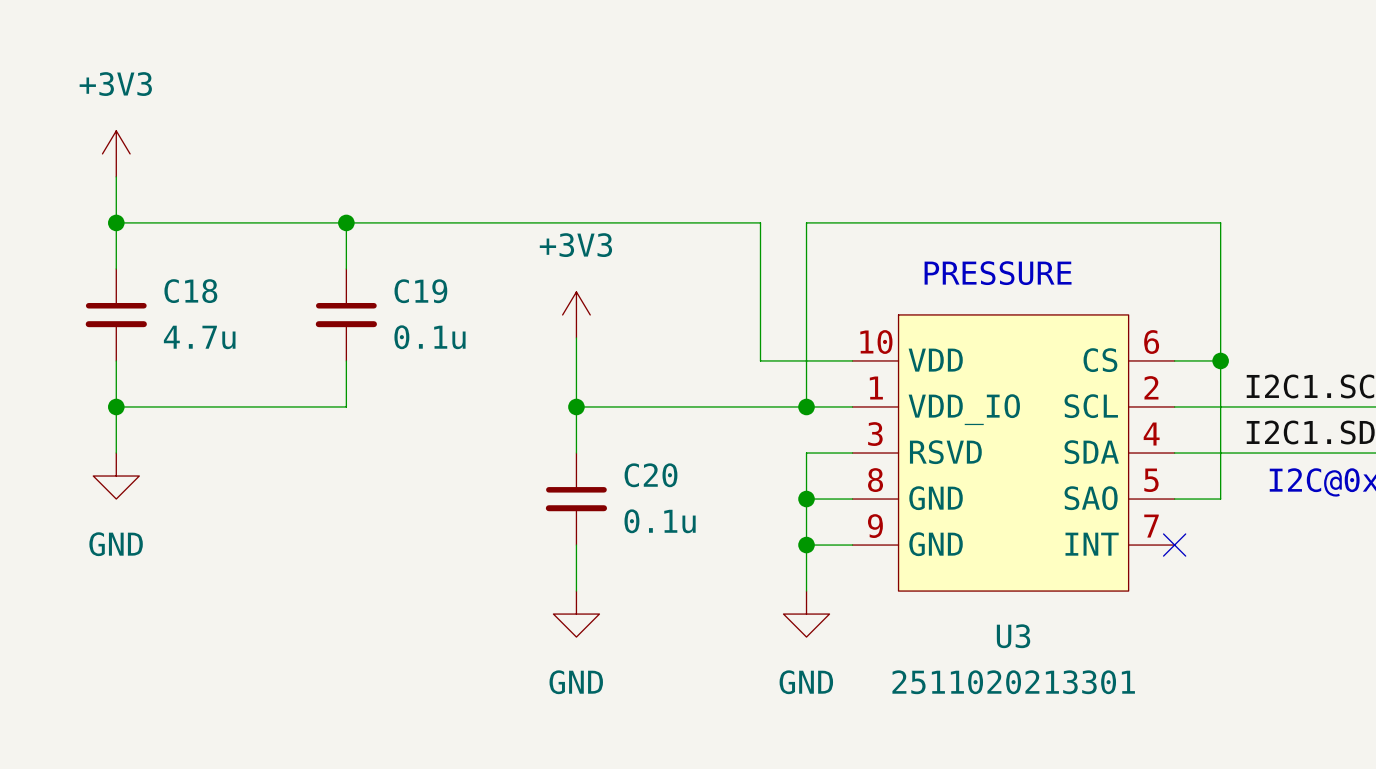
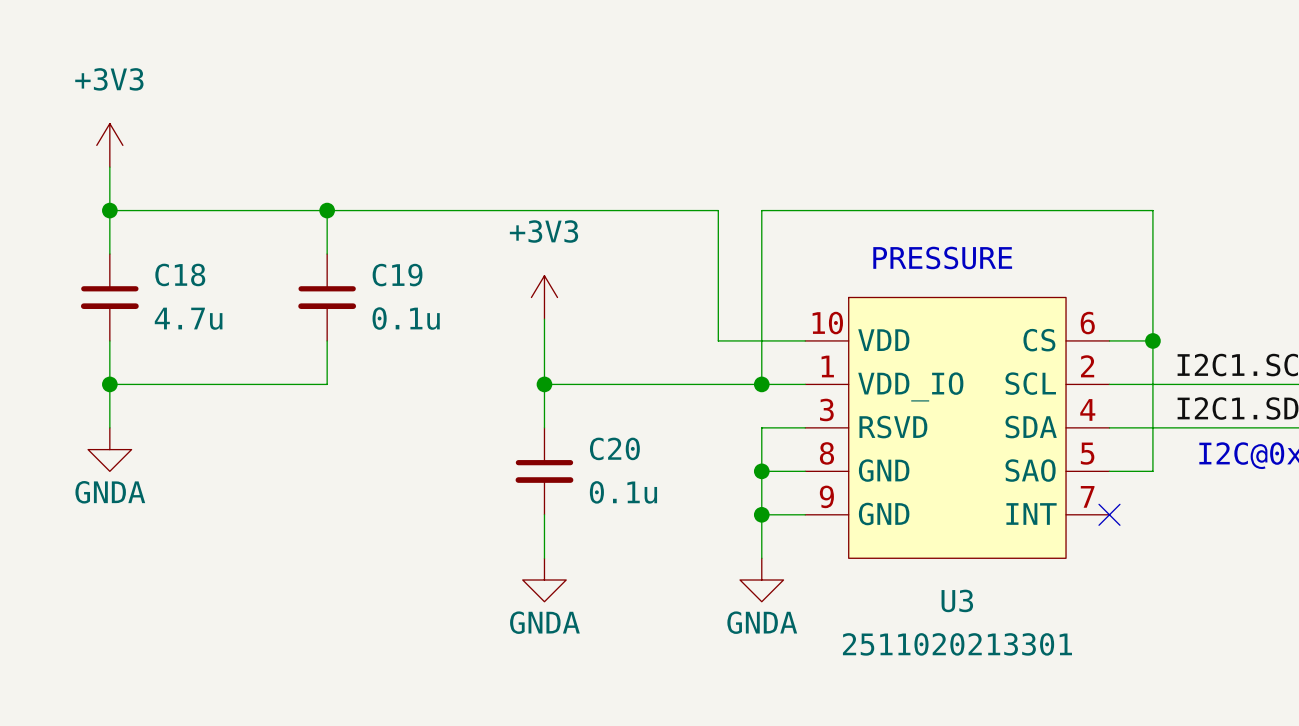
power symbol: GND (116, 476) -> GNDA (109, 449)
power symbol: GND (576, 614) -> GNDA (544, 580)
power symbol: GND (806, 614) -> GNDA (761, 580)

